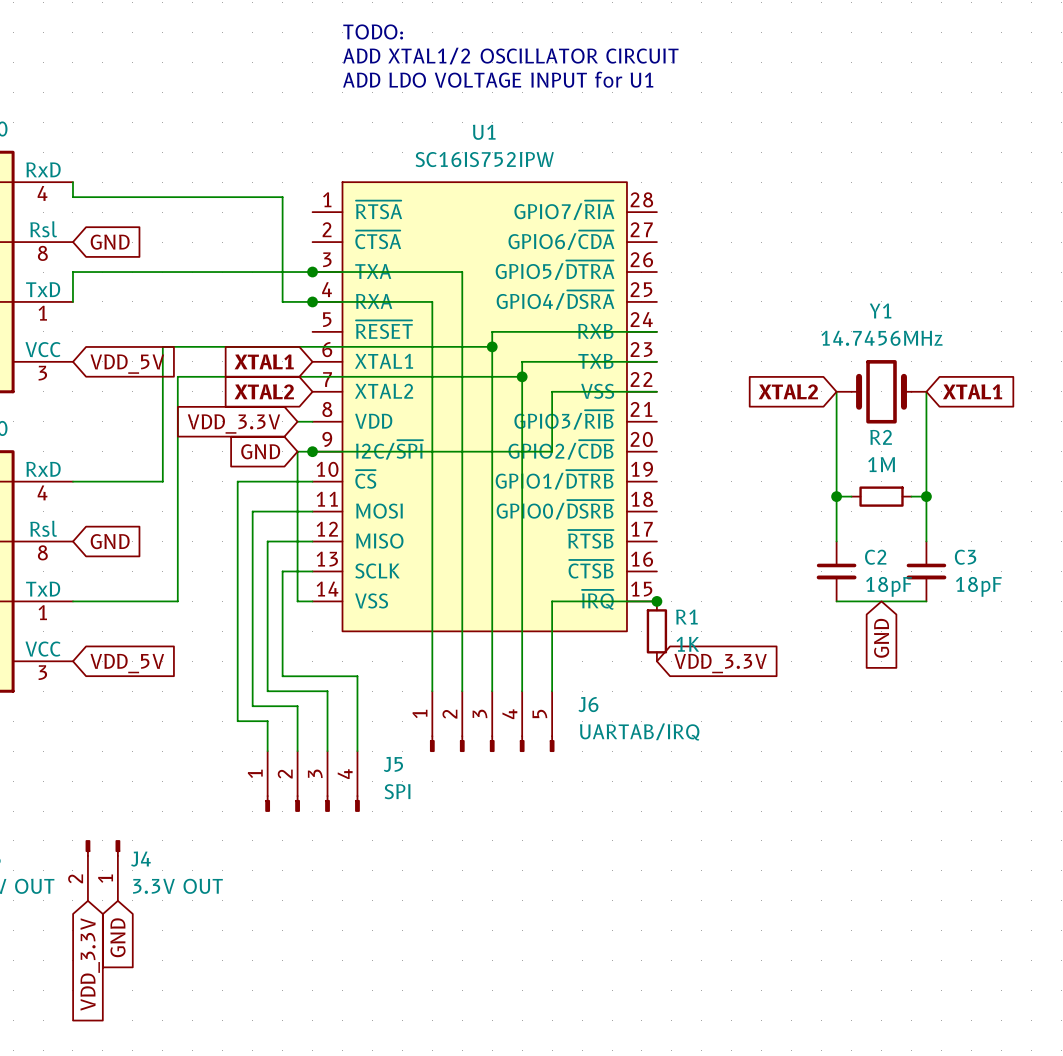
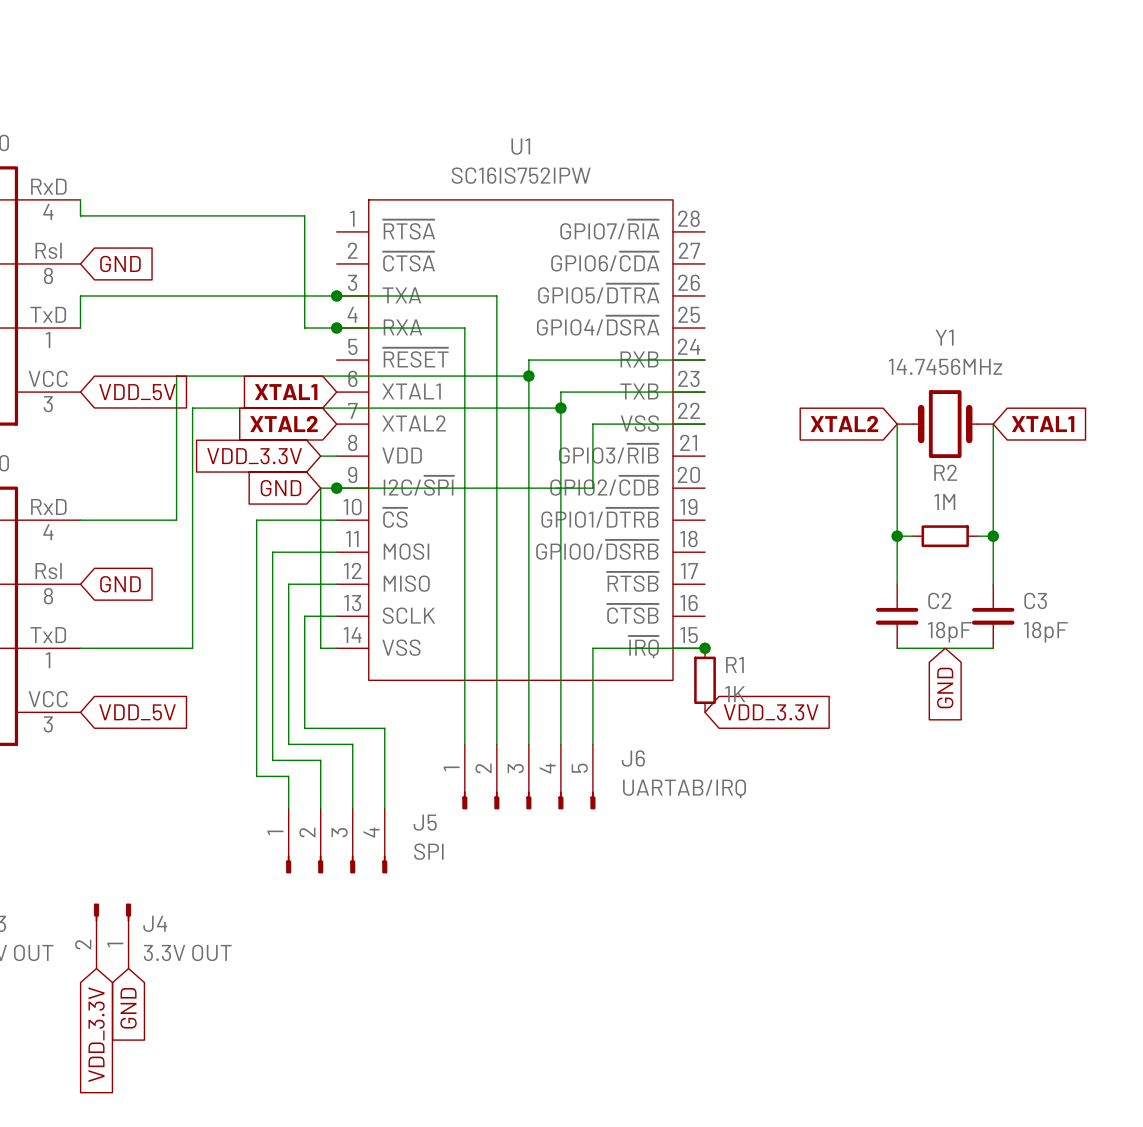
text: TODO: (373, 31) -> none
text: ADD XTAL1/2 OSCILLATOR CIRCUIT (510, 56) -> none
text: ADD LDO VOLTAGE INPUT for U1 (498, 79) -> none

